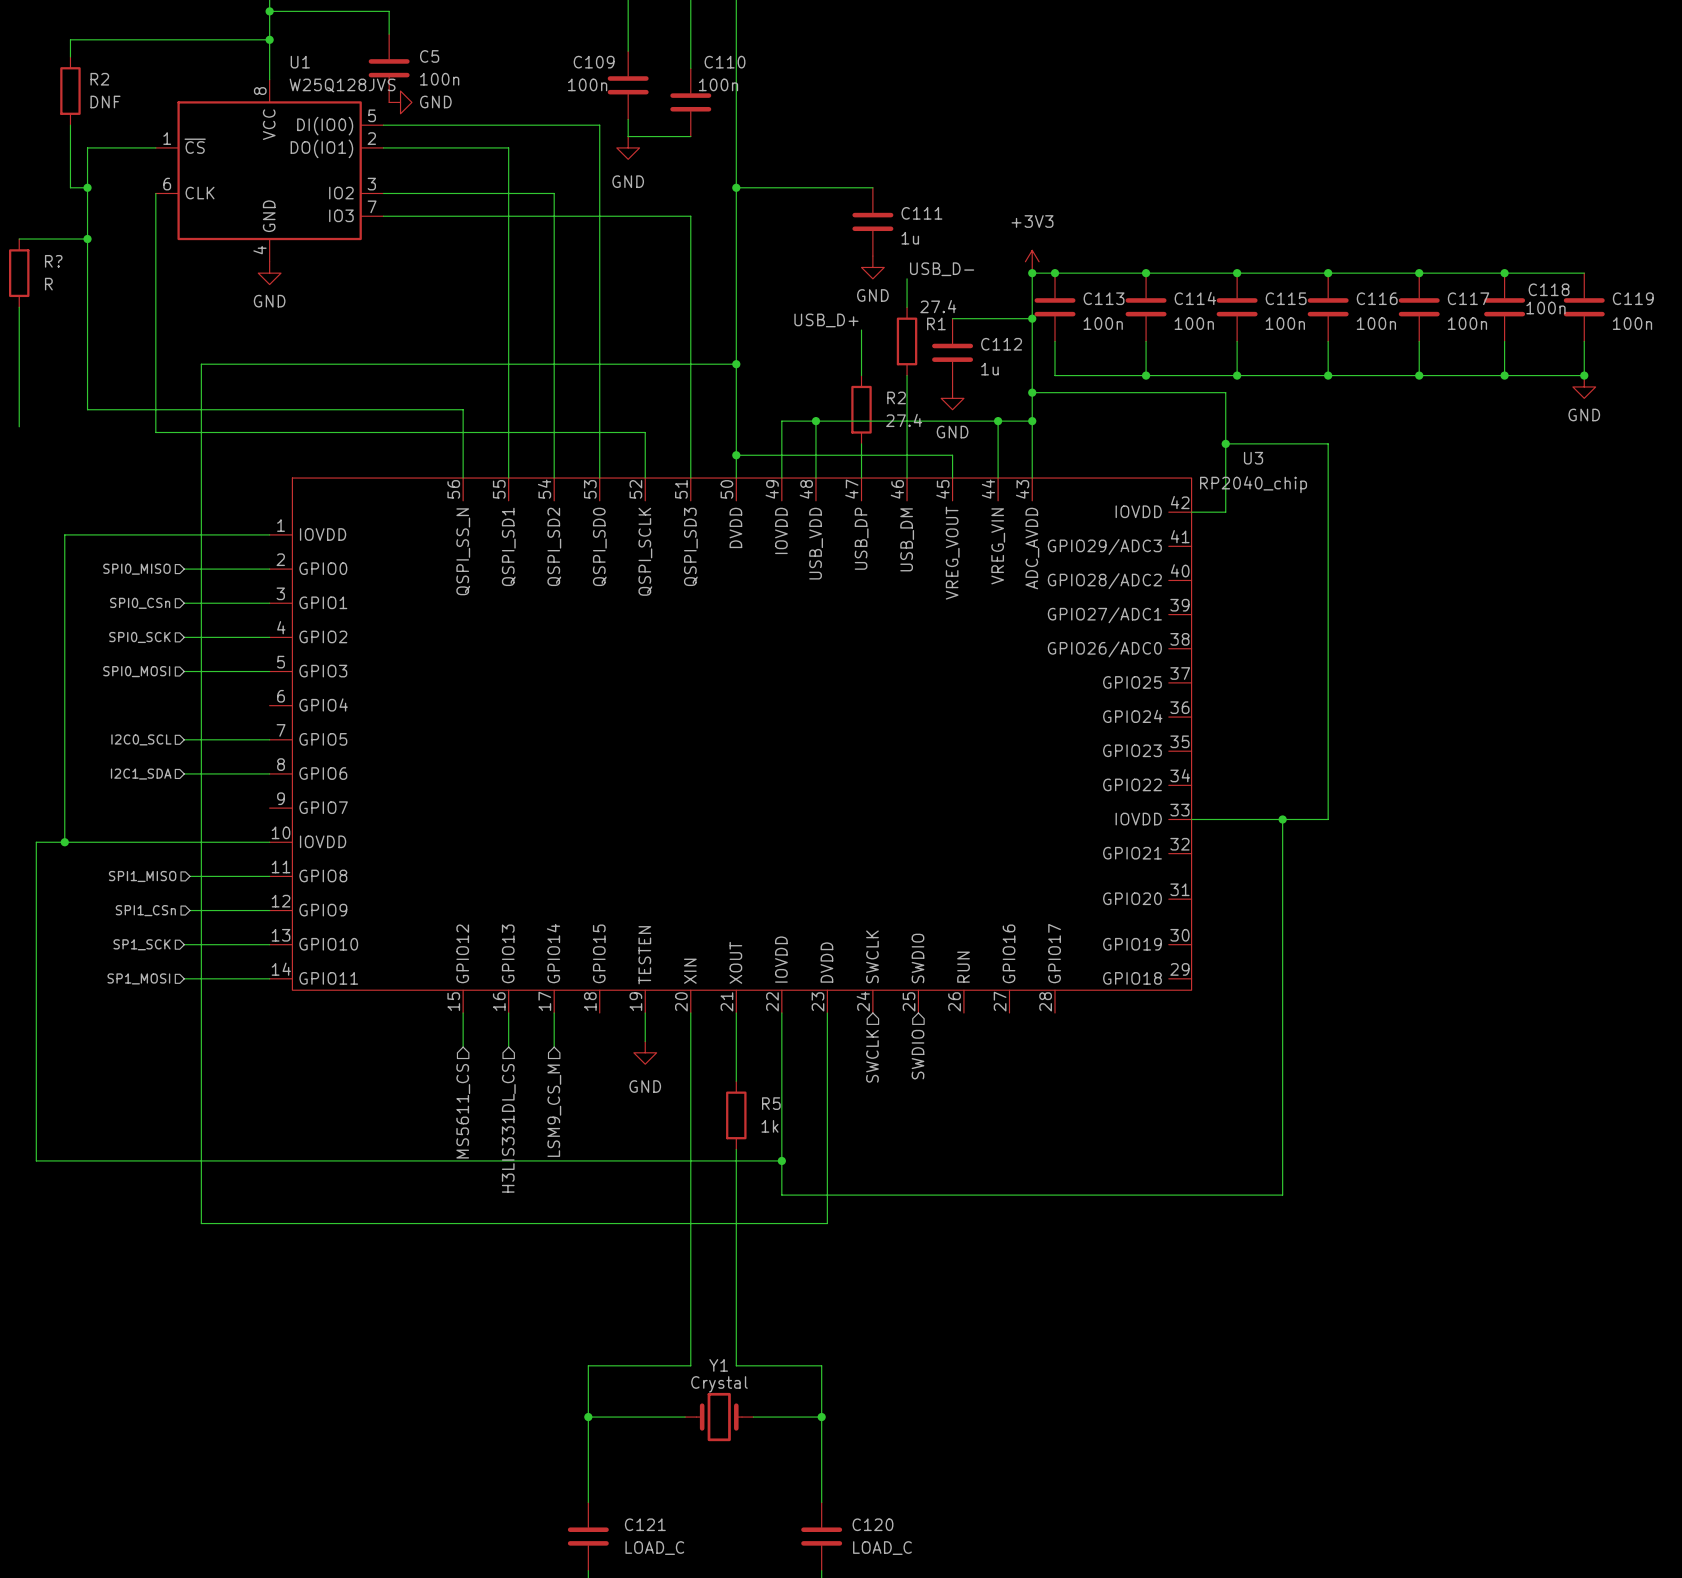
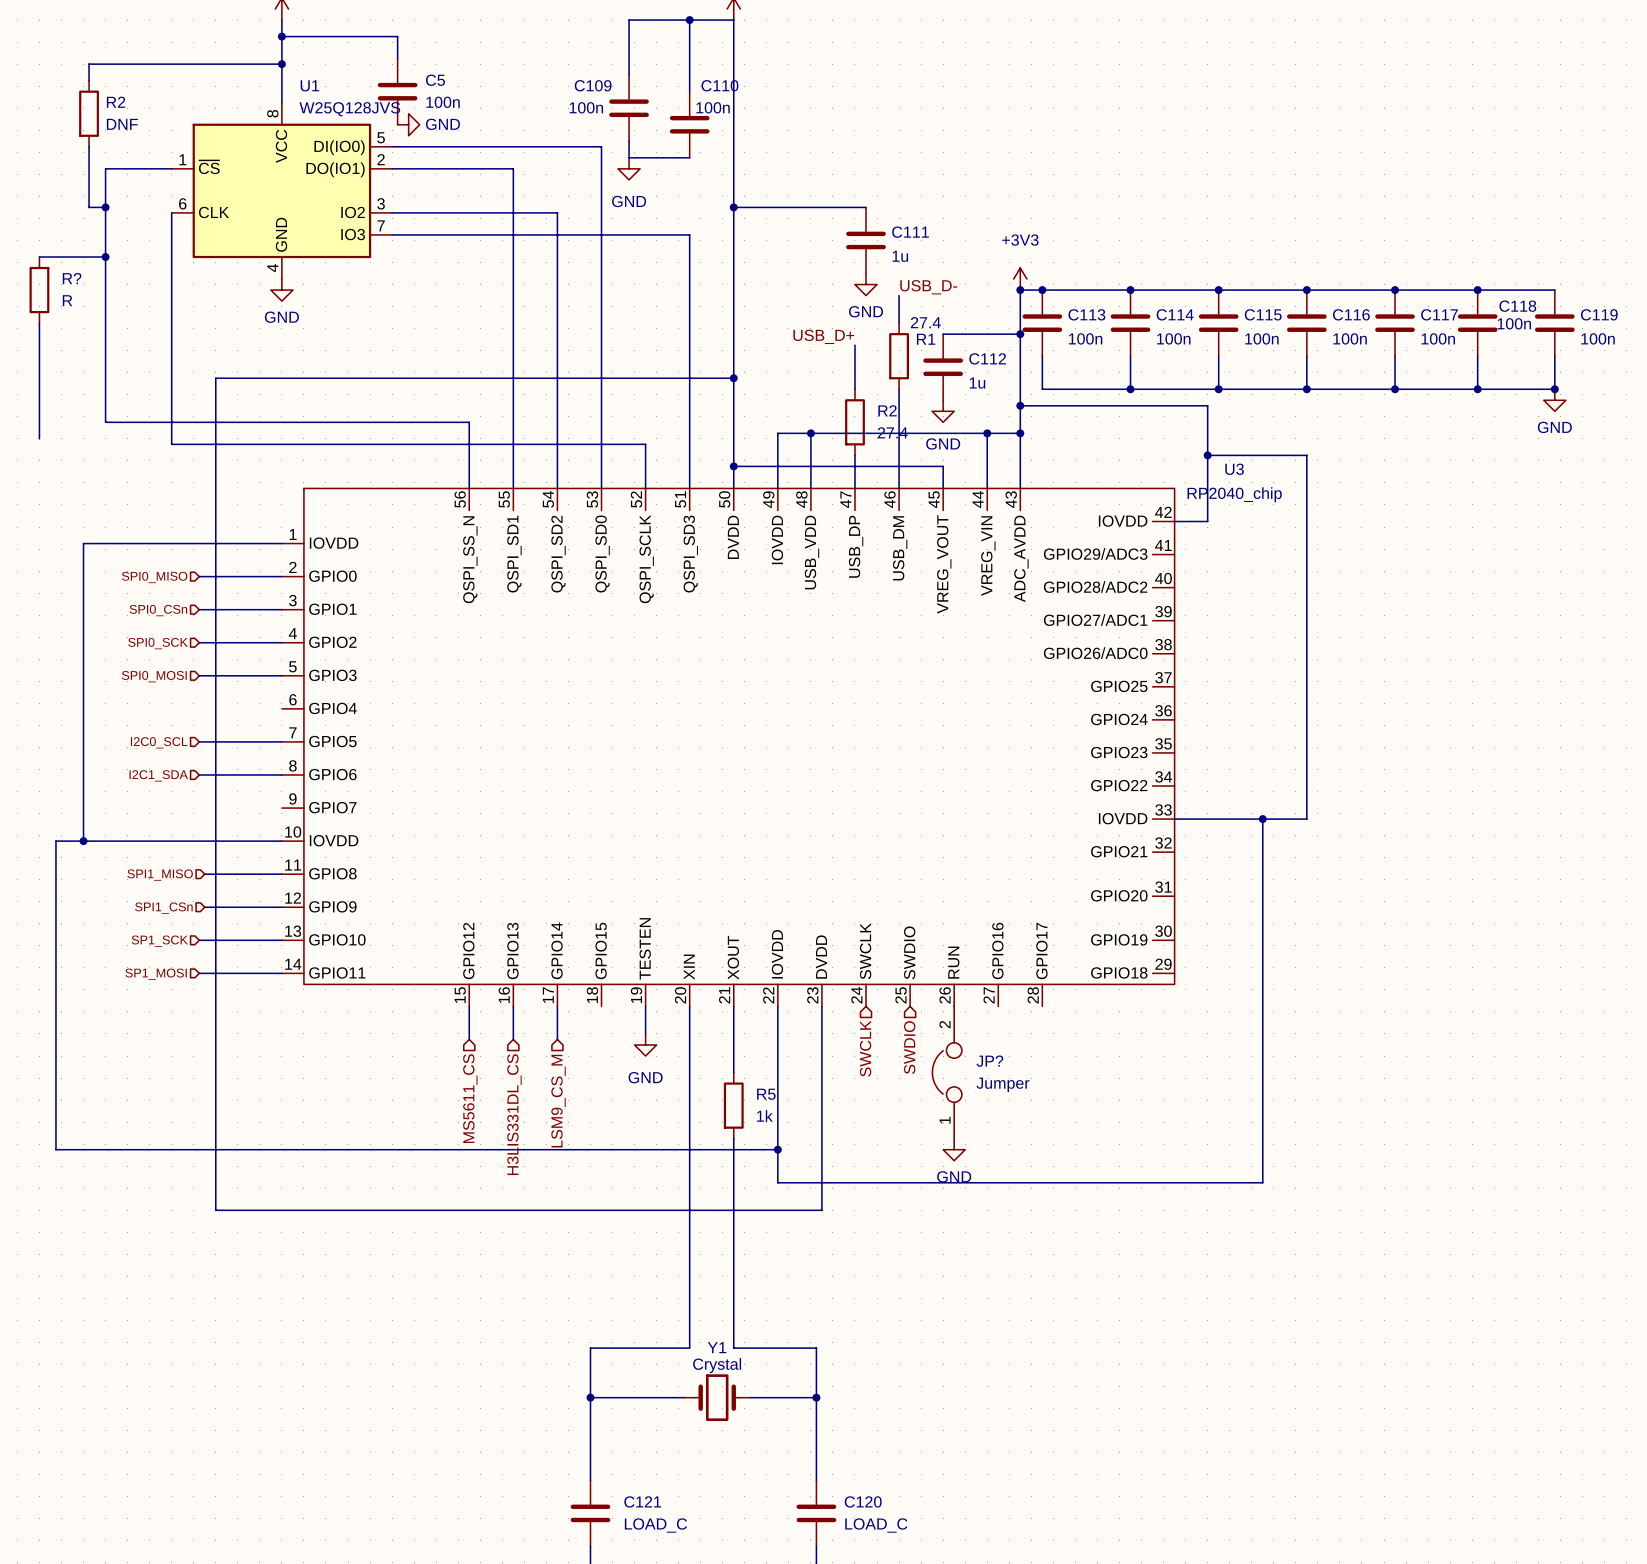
JP?: none -> Jumper (947, 1072)
power symbol: none -> GND (954, 1149)

